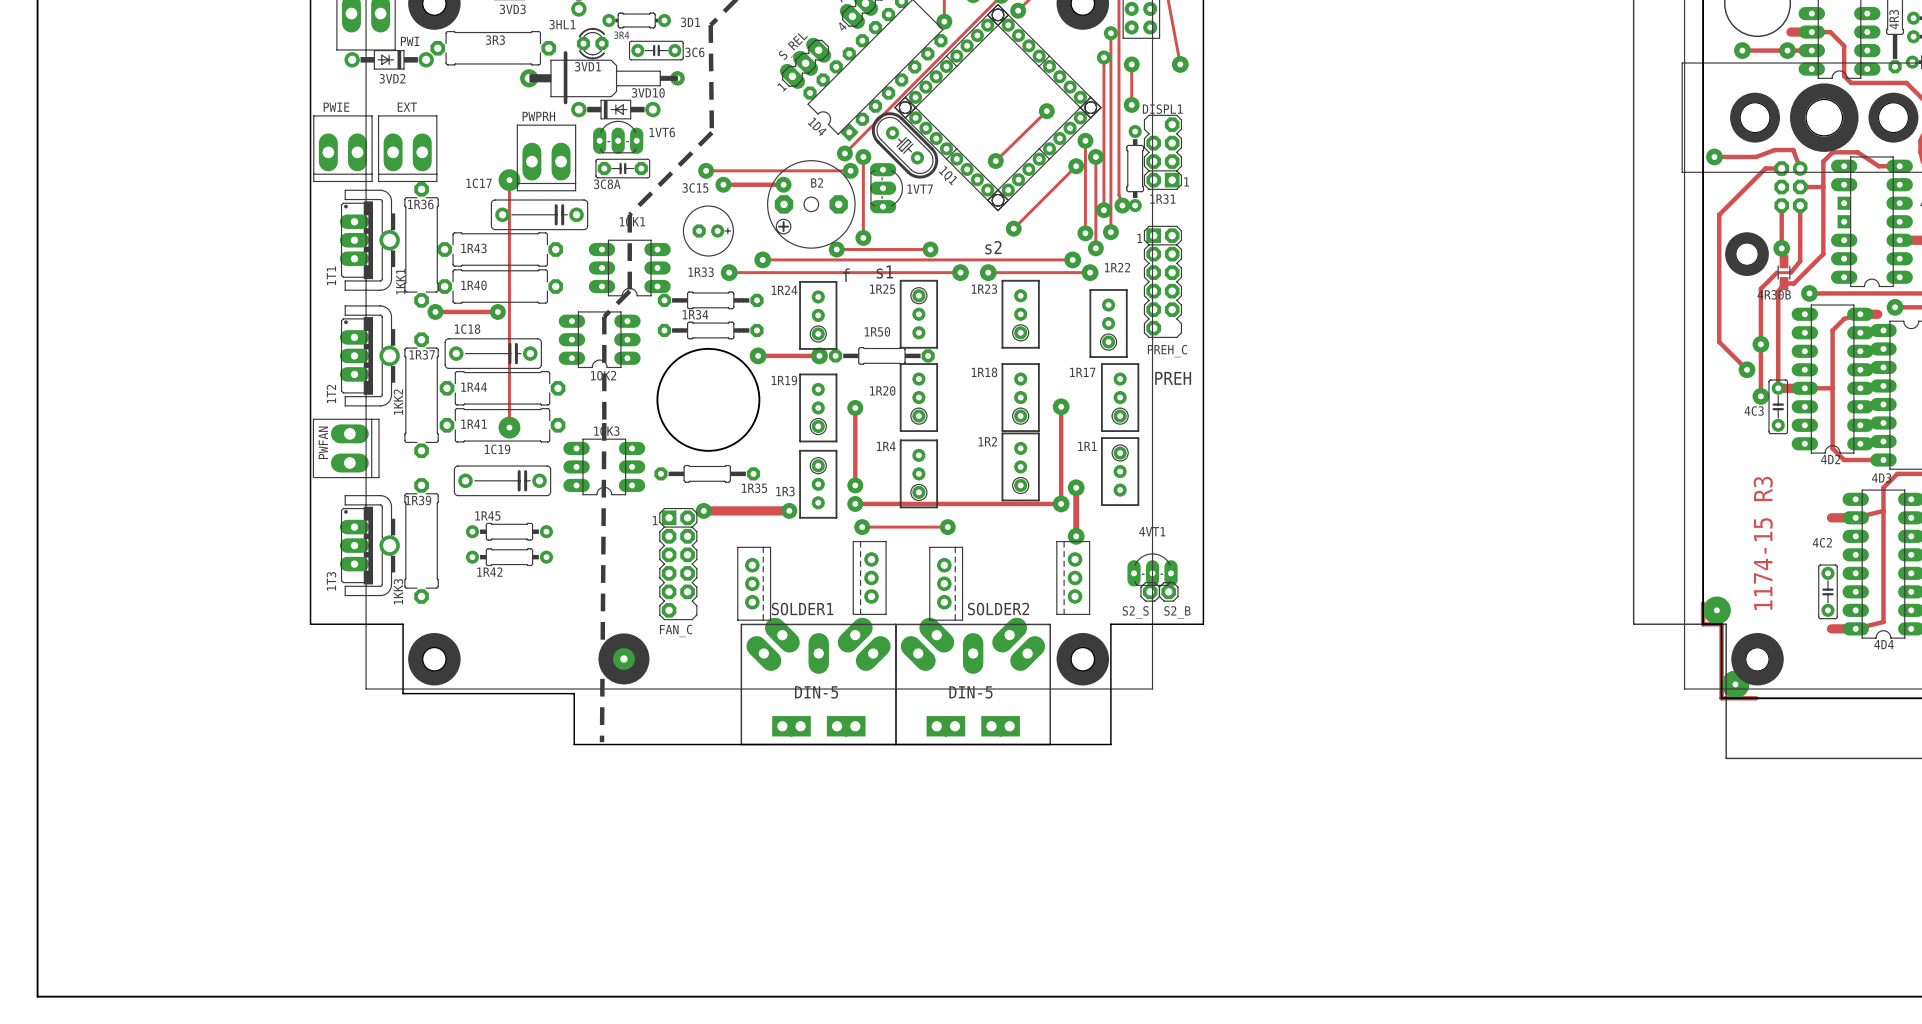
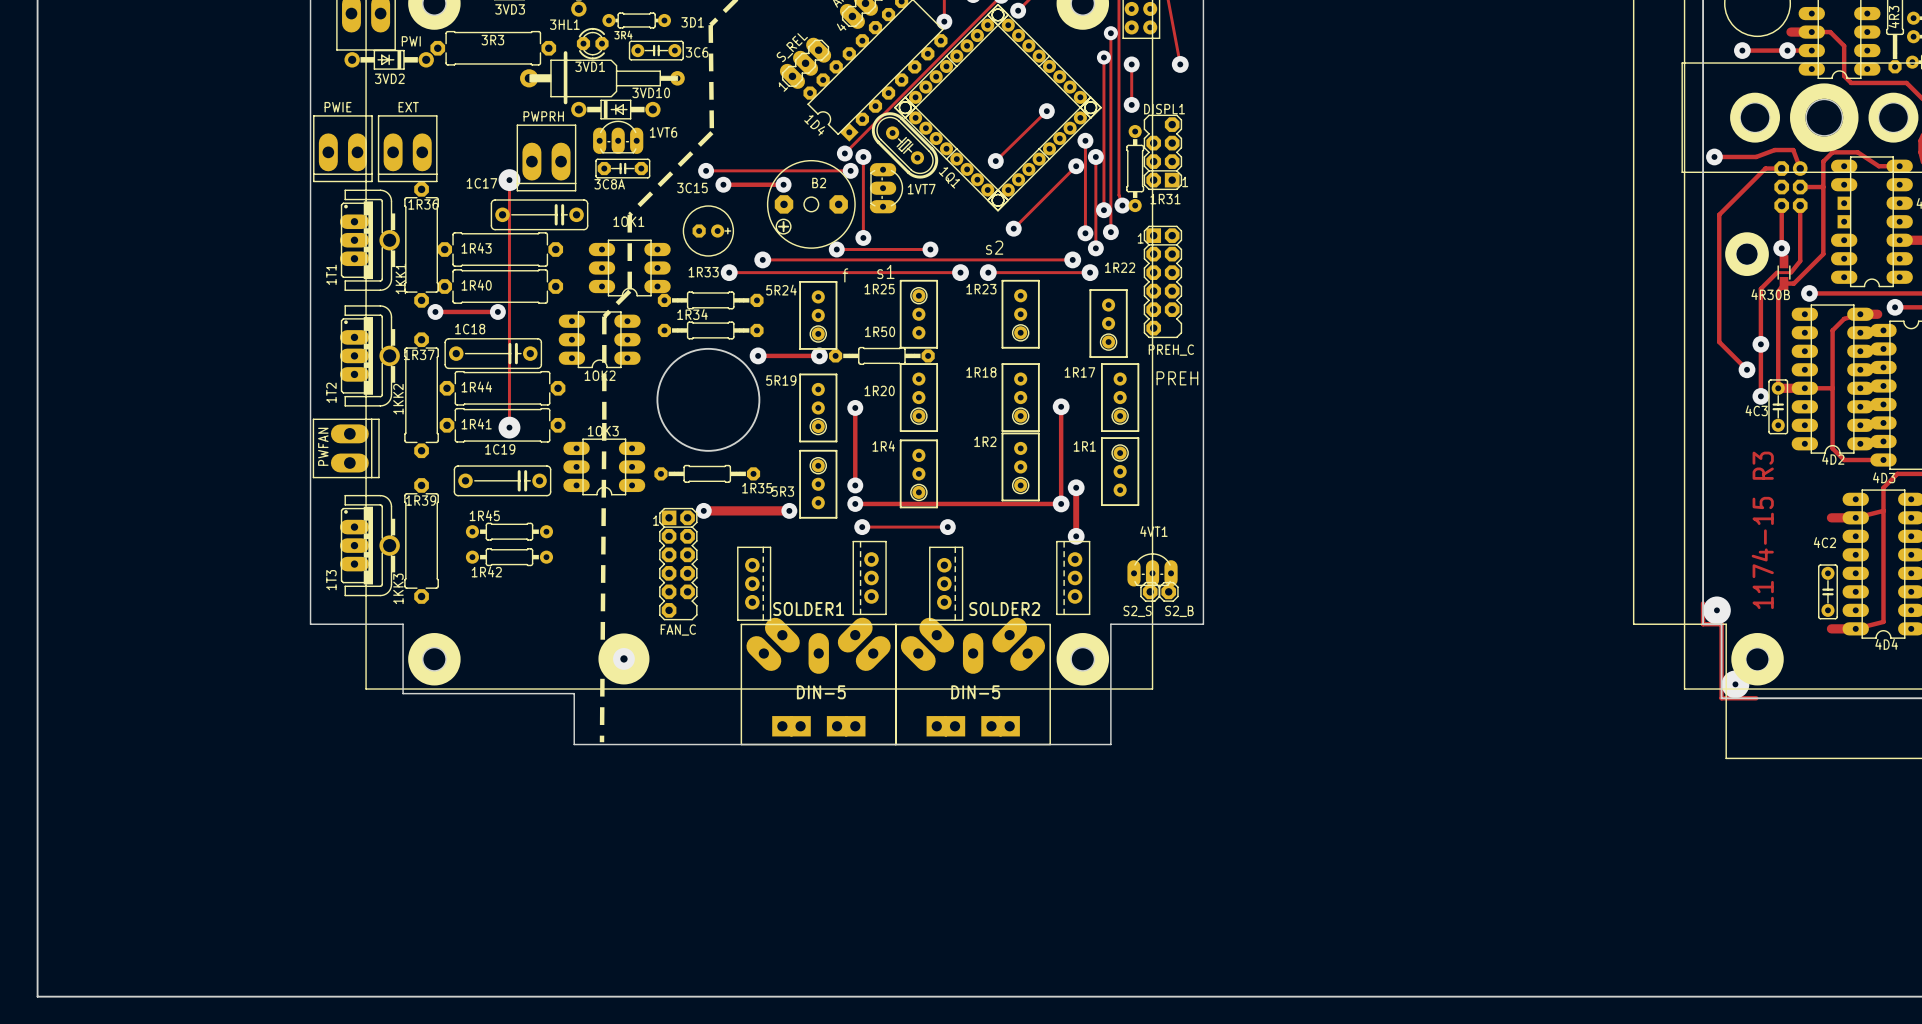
1R24 name: 1R24 (784, 290) -> 5R24 (781, 290)
1R19 name: 1R19 (784, 380) -> 5R19 (781, 380)
1R3 name: 1R3 (785, 491) -> 5R3 (782, 491)

